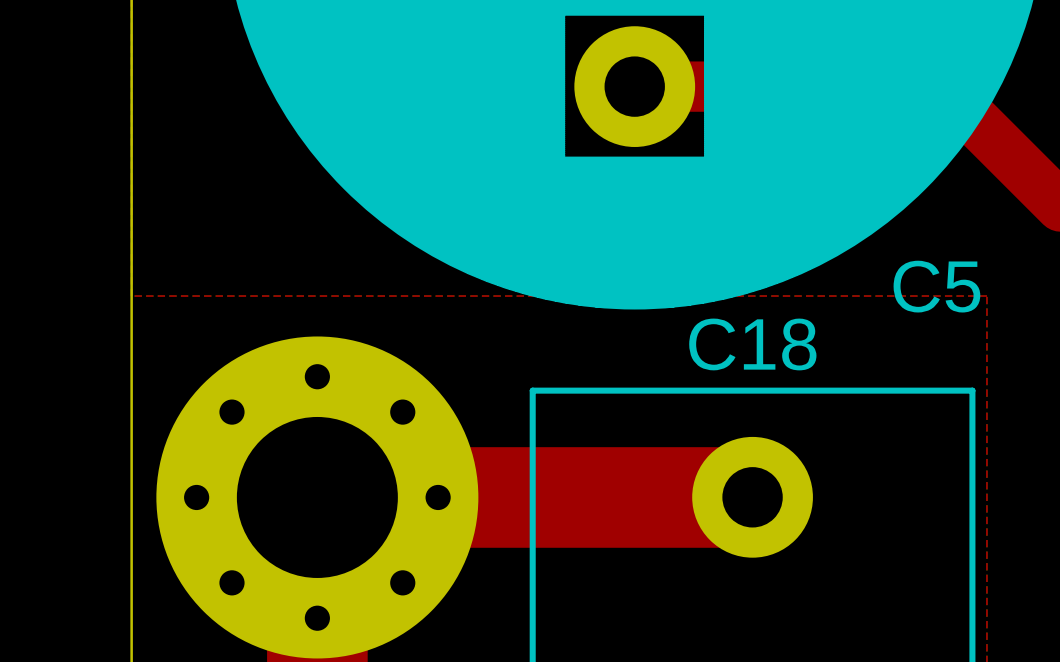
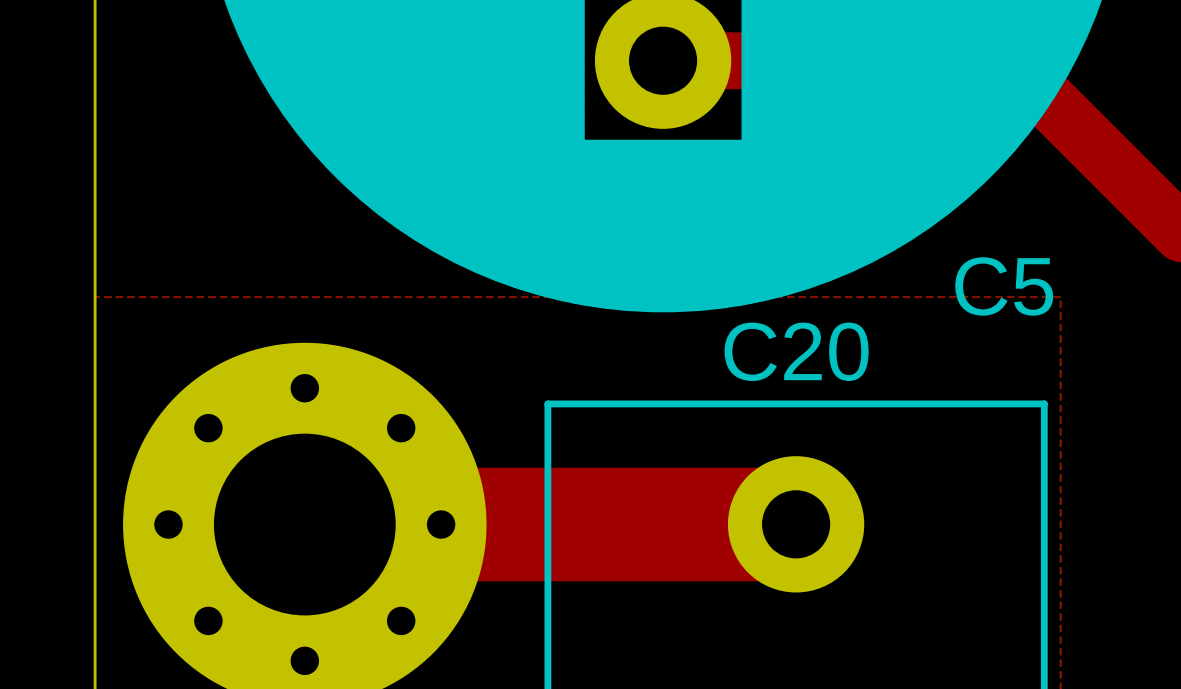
C18 name: C18 (752, 344) -> C20 (796, 351)

